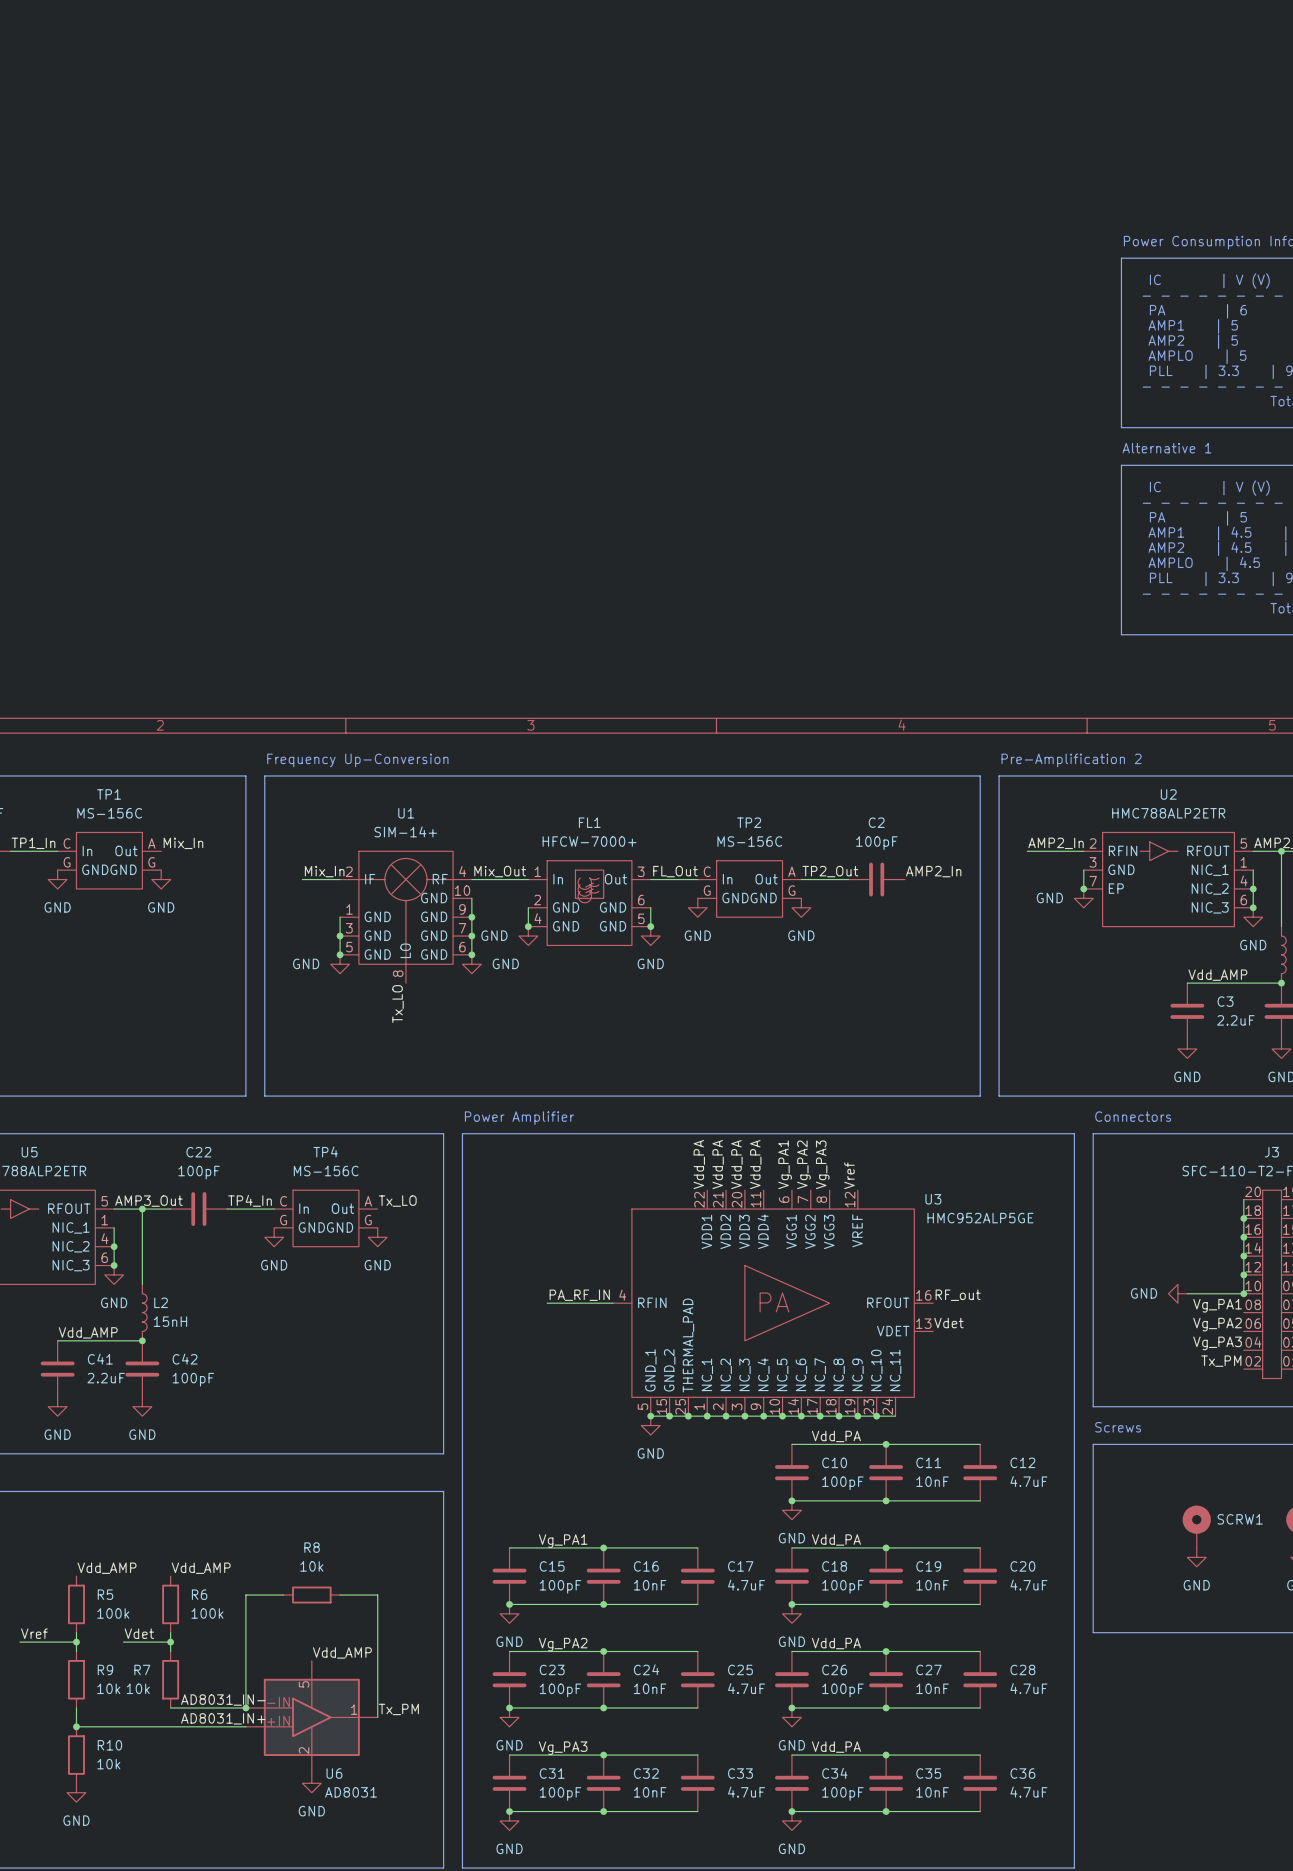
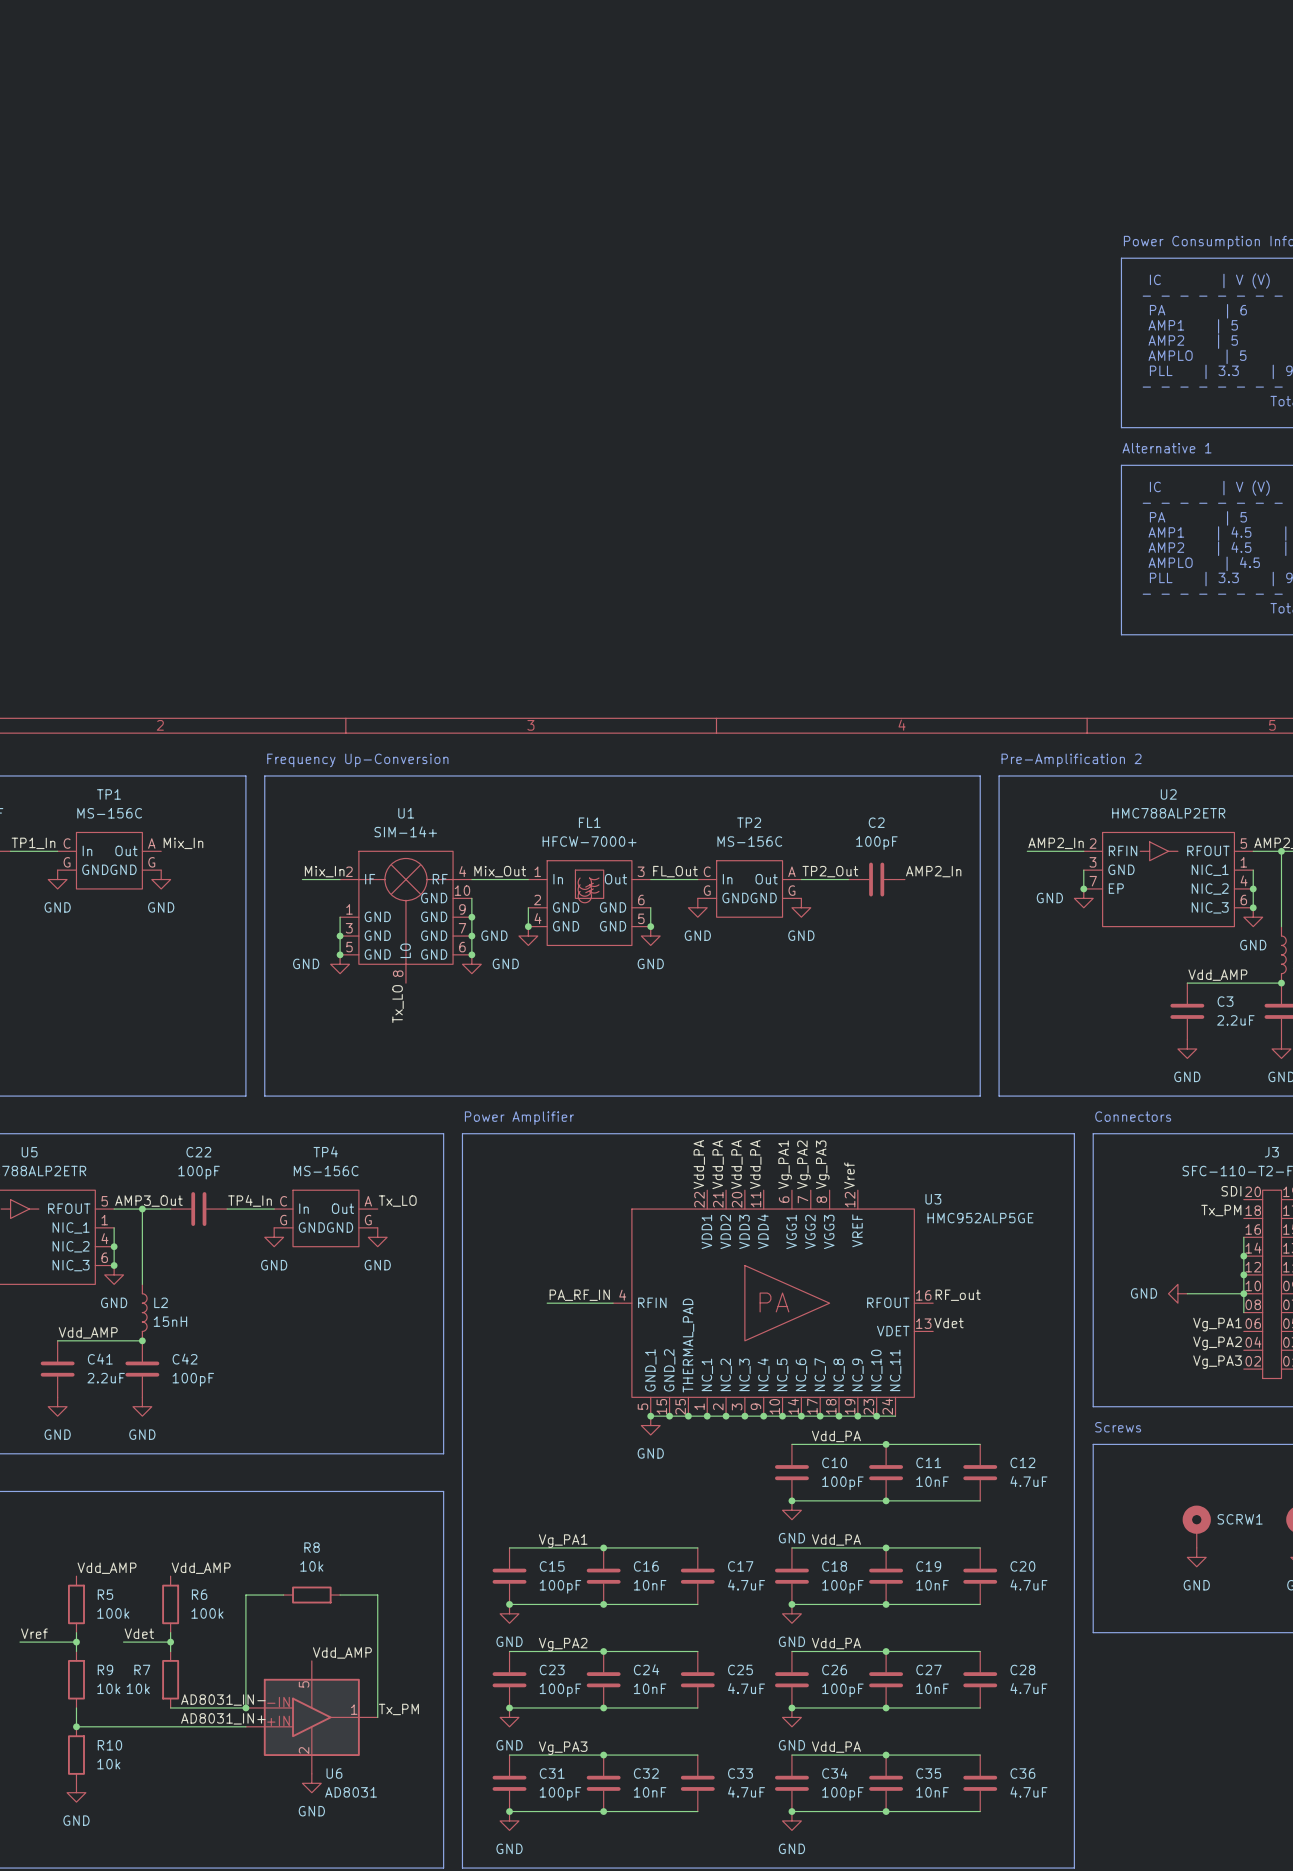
label: none -> SDI (1231, 1191)
wire: (1243, 1199) (1243, 1237) -> none
label: none -> Tx_PM (1221, 1210)
junction: (1243, 1218) -> none
junction: (1243, 1237) -> none
wire: none -> (1243, 1293) (1243, 1312)
label: Vg_PA1 (1217, 1305) -> none
label: Vg_PA2 (1217, 1324) -> Vg_PA1 (1217, 1324)
label: Vg_PA3 (1217, 1343) -> Vg_PA2 (1217, 1343)
label: Tx_PM (1221, 1361) -> Vg_PA3 (1217, 1362)

